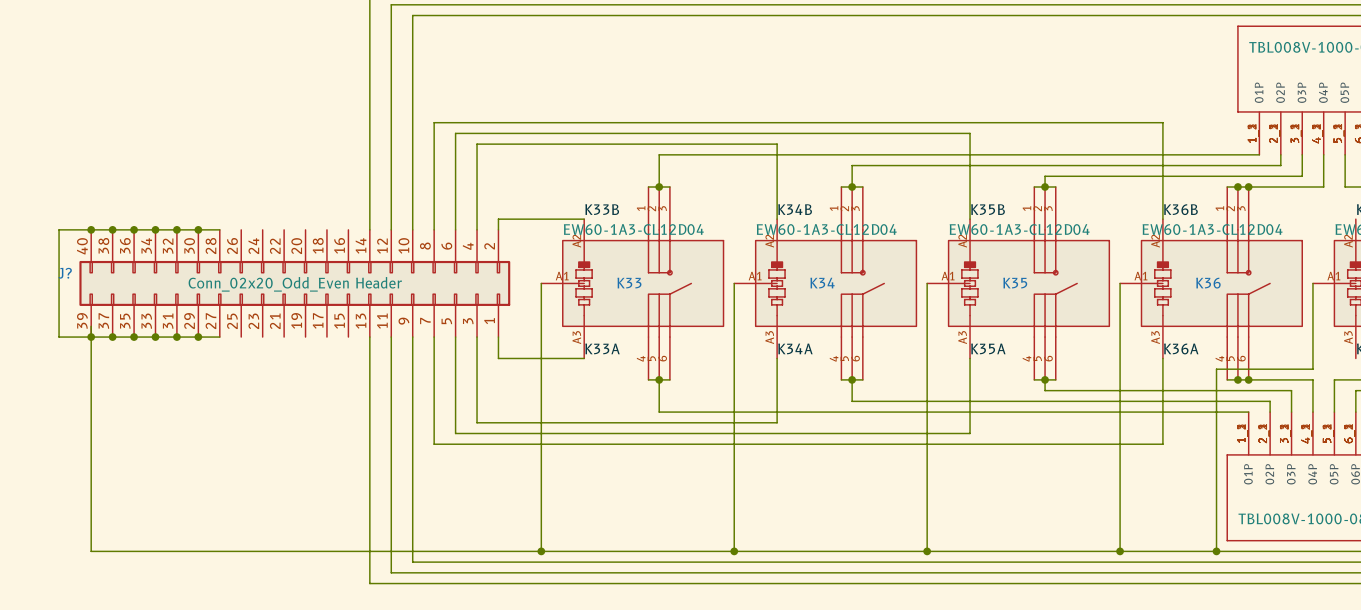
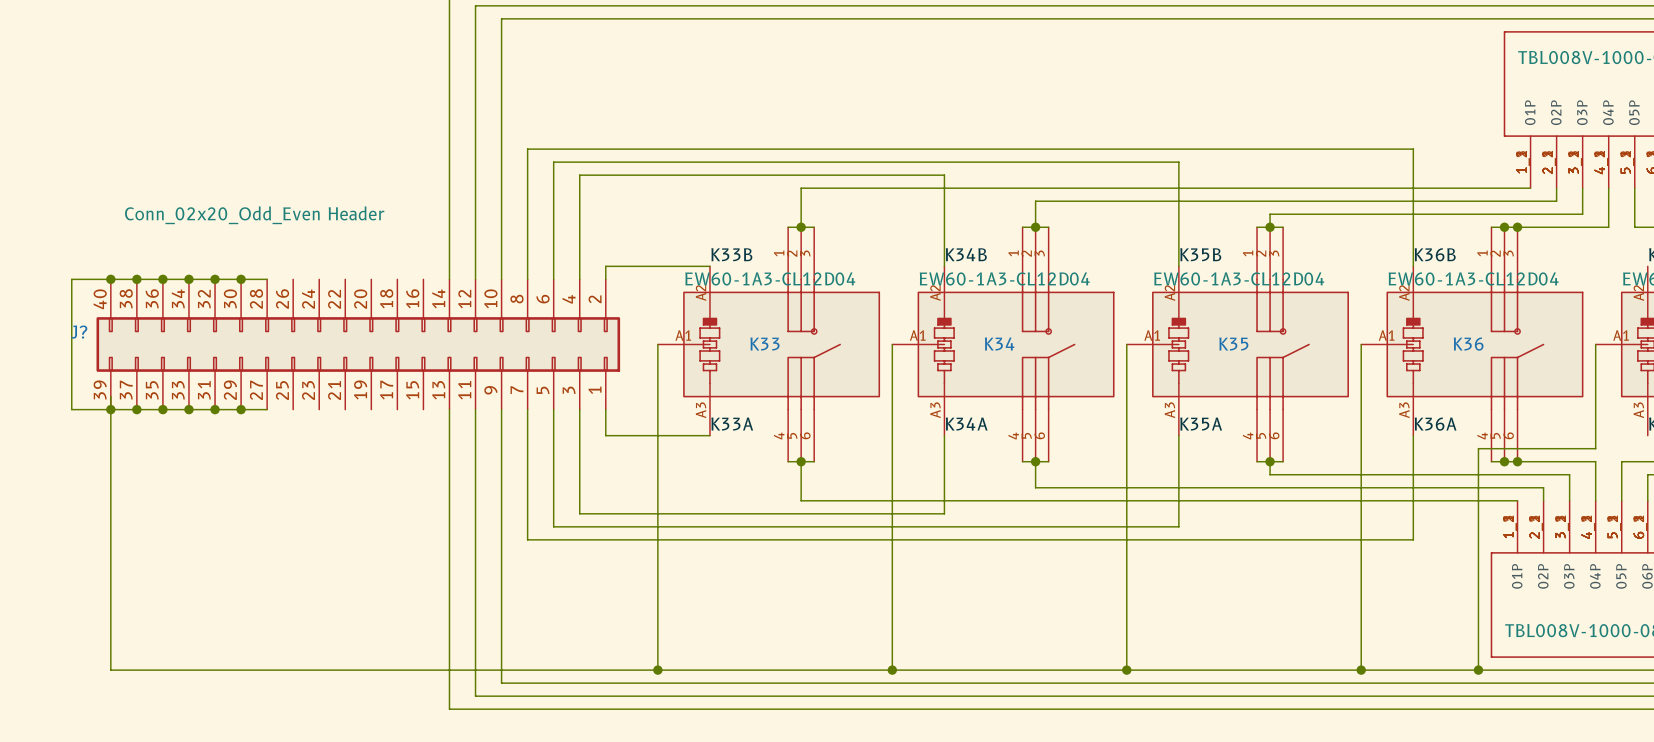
J? value position: Conn_02x20_Odd_Even Header (295, 284) -> Conn_02x20_Odd_Even Header (254, 215)

